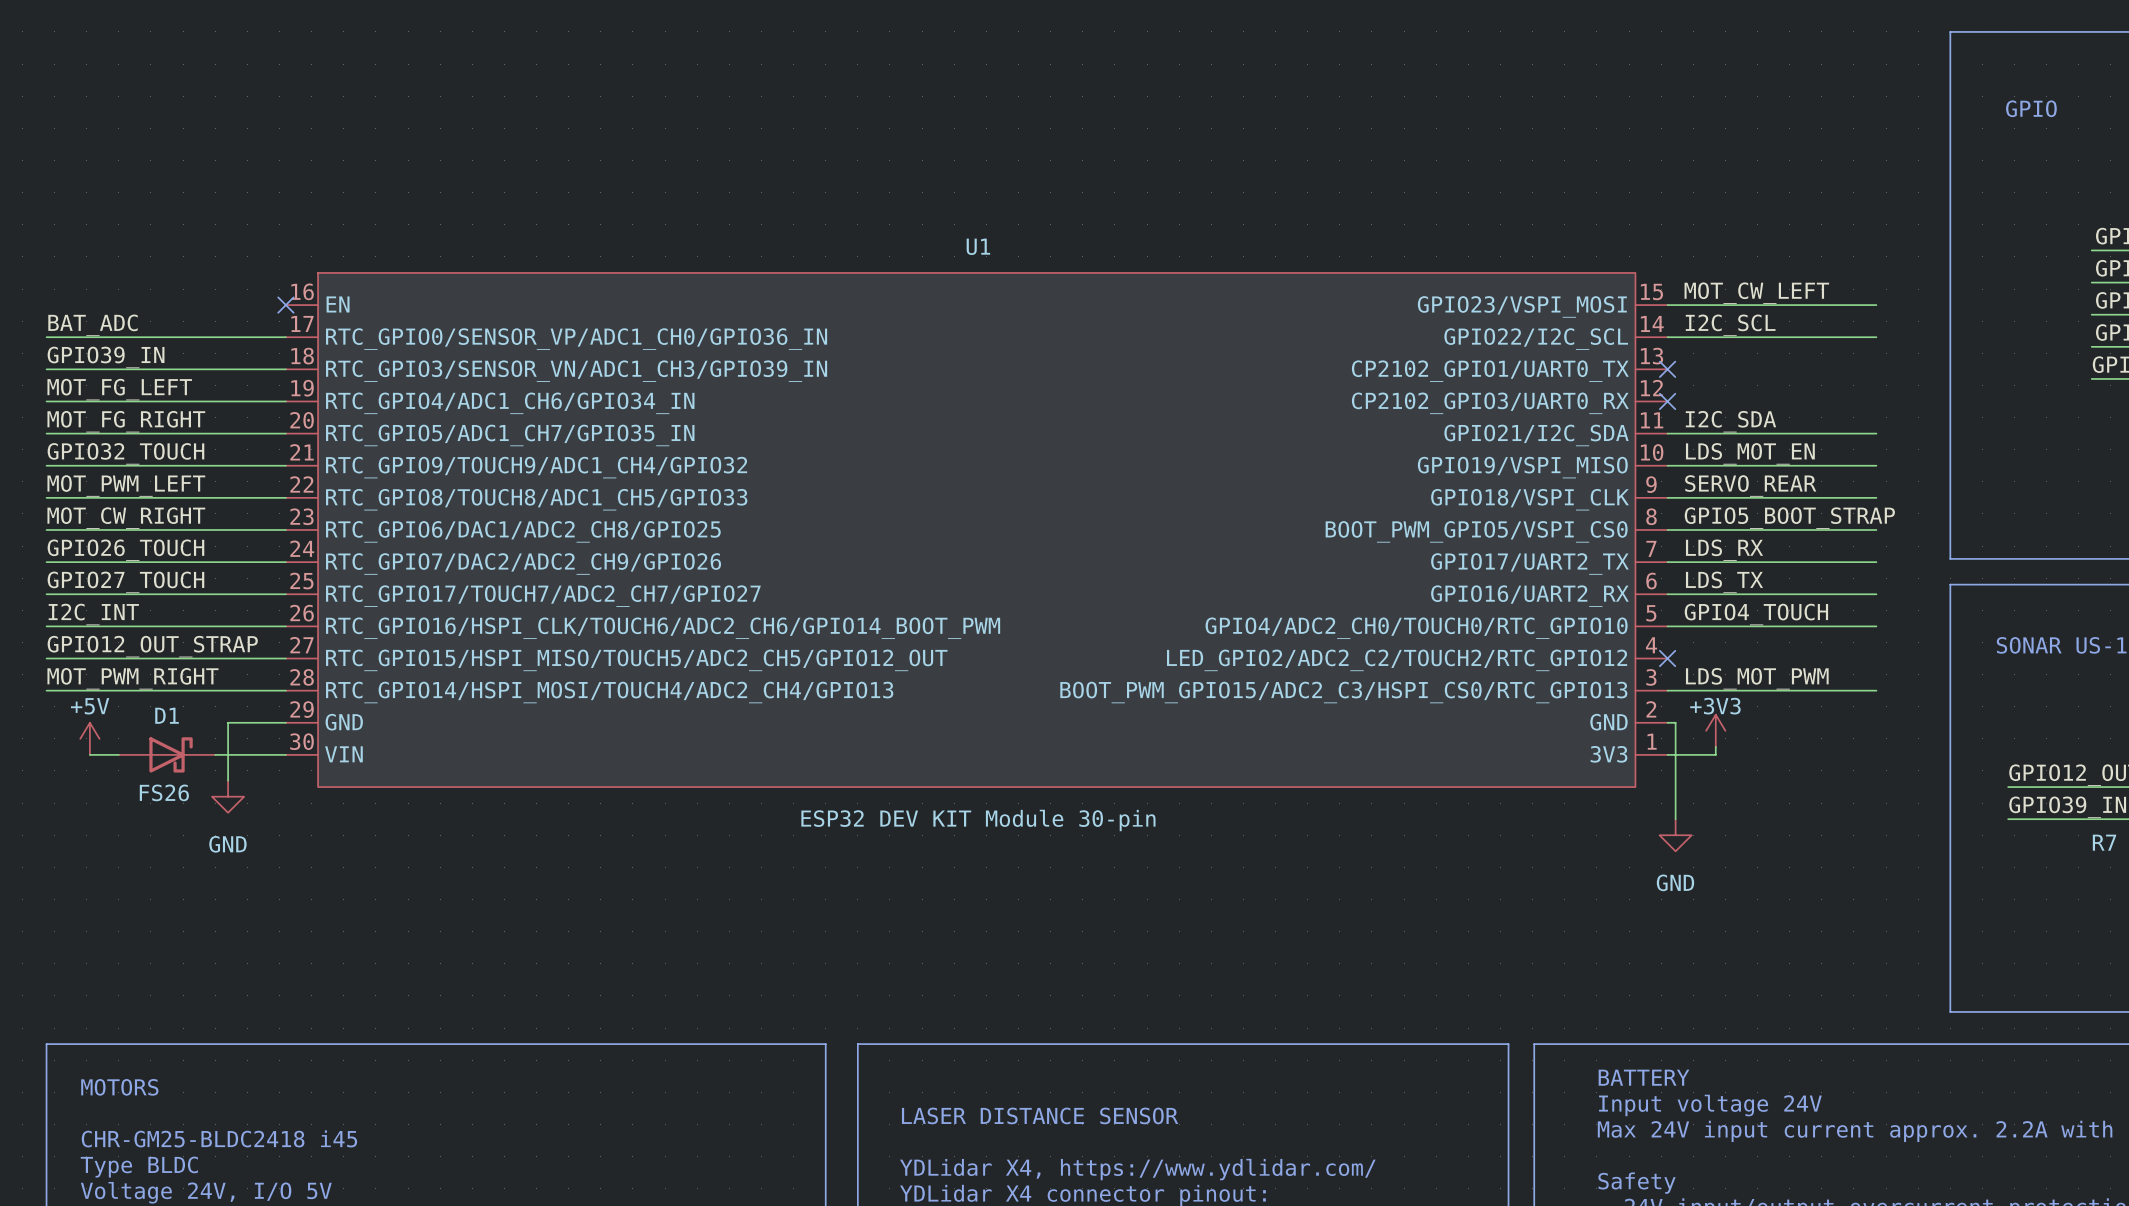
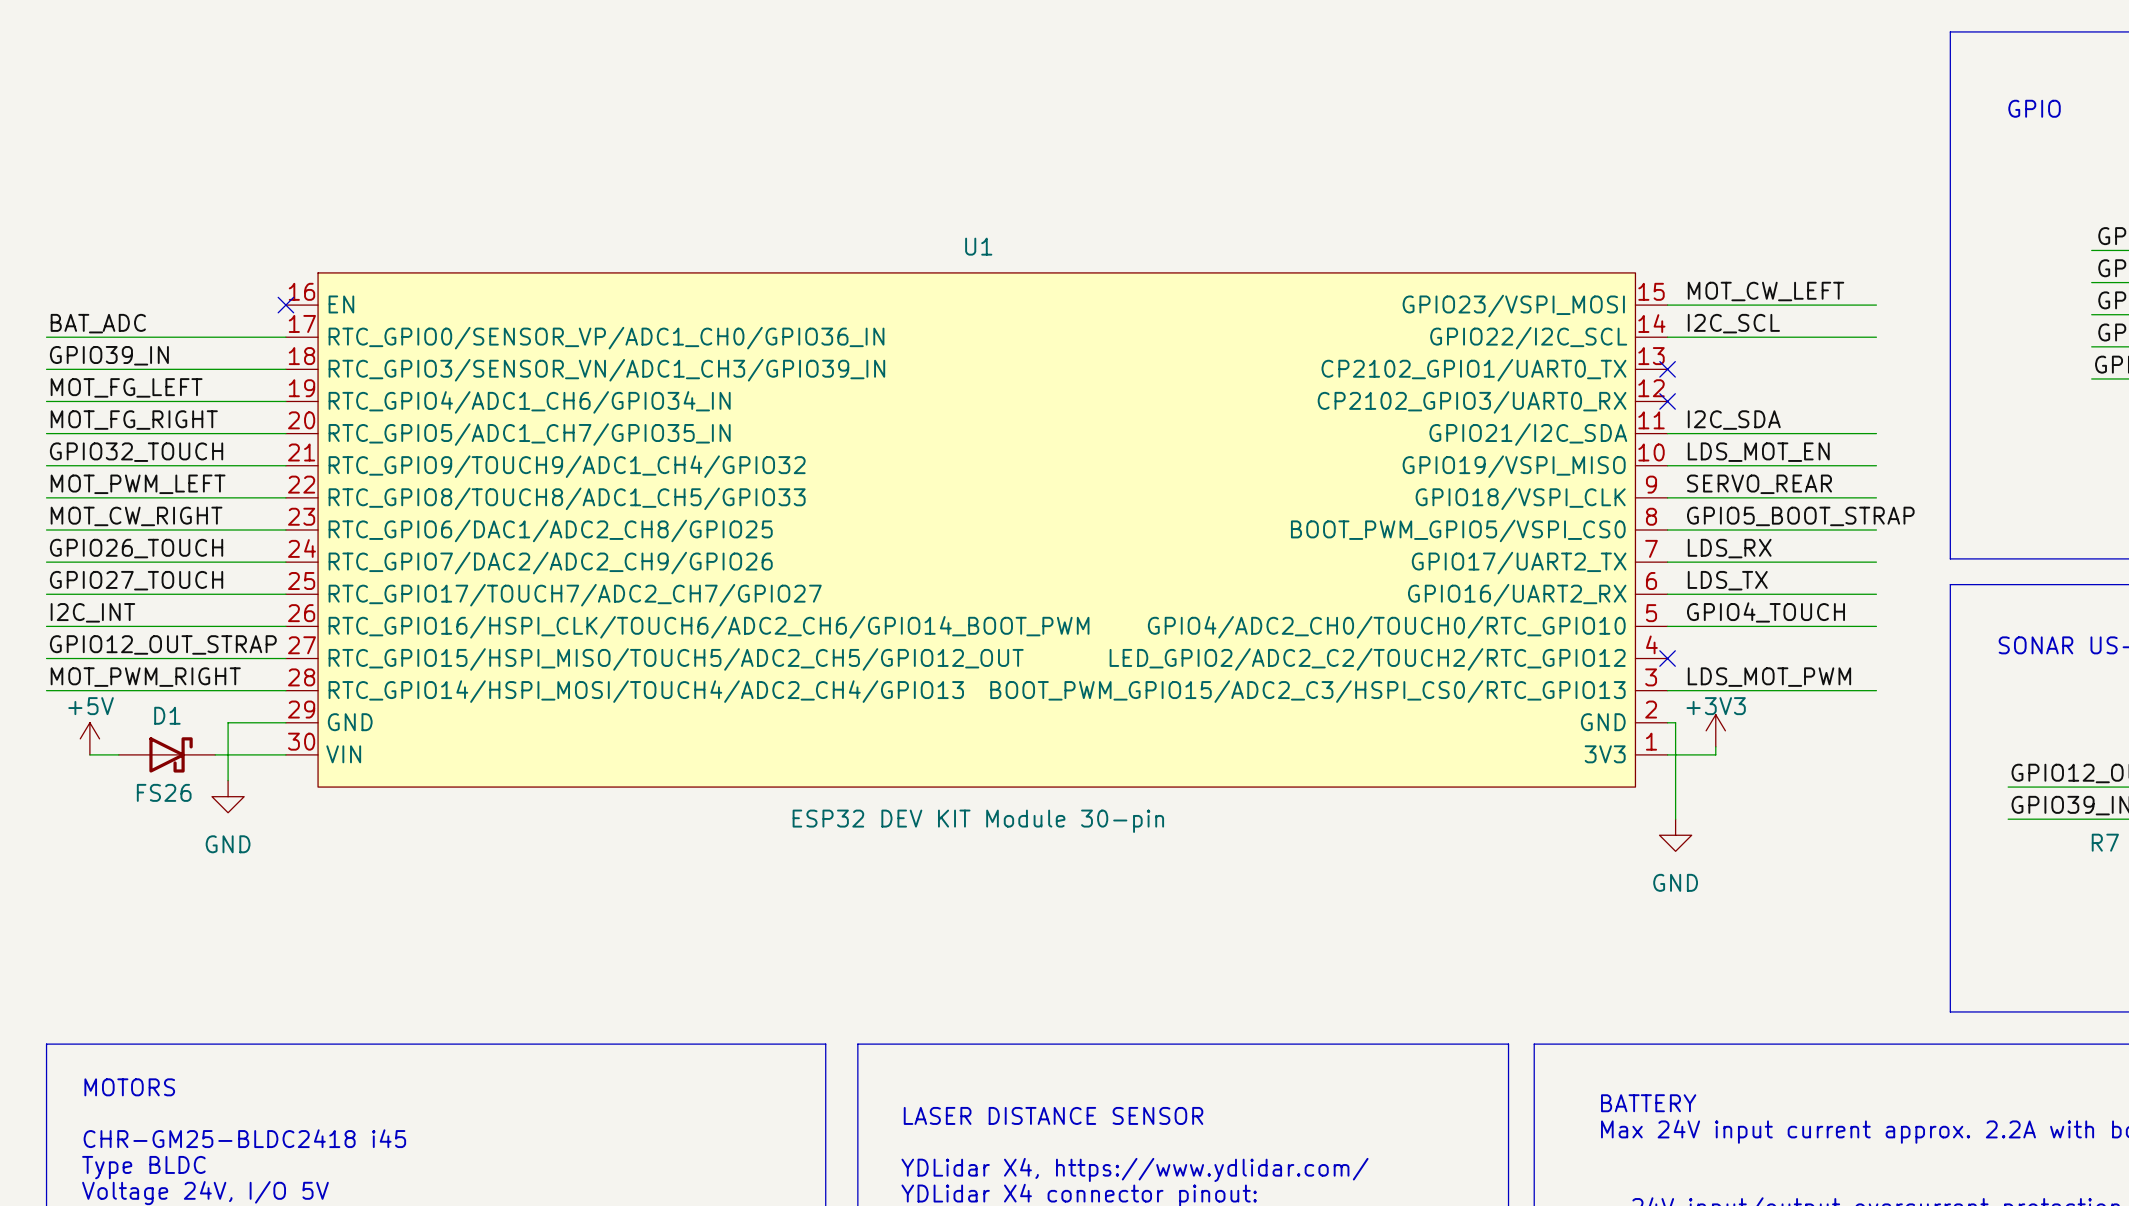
text: BATTERY (1644, 1077) -> none
text: Input voltage 24V (1710, 1105) -> BATTERY (1648, 1103)
text: Safety (1637, 1183) -> none

